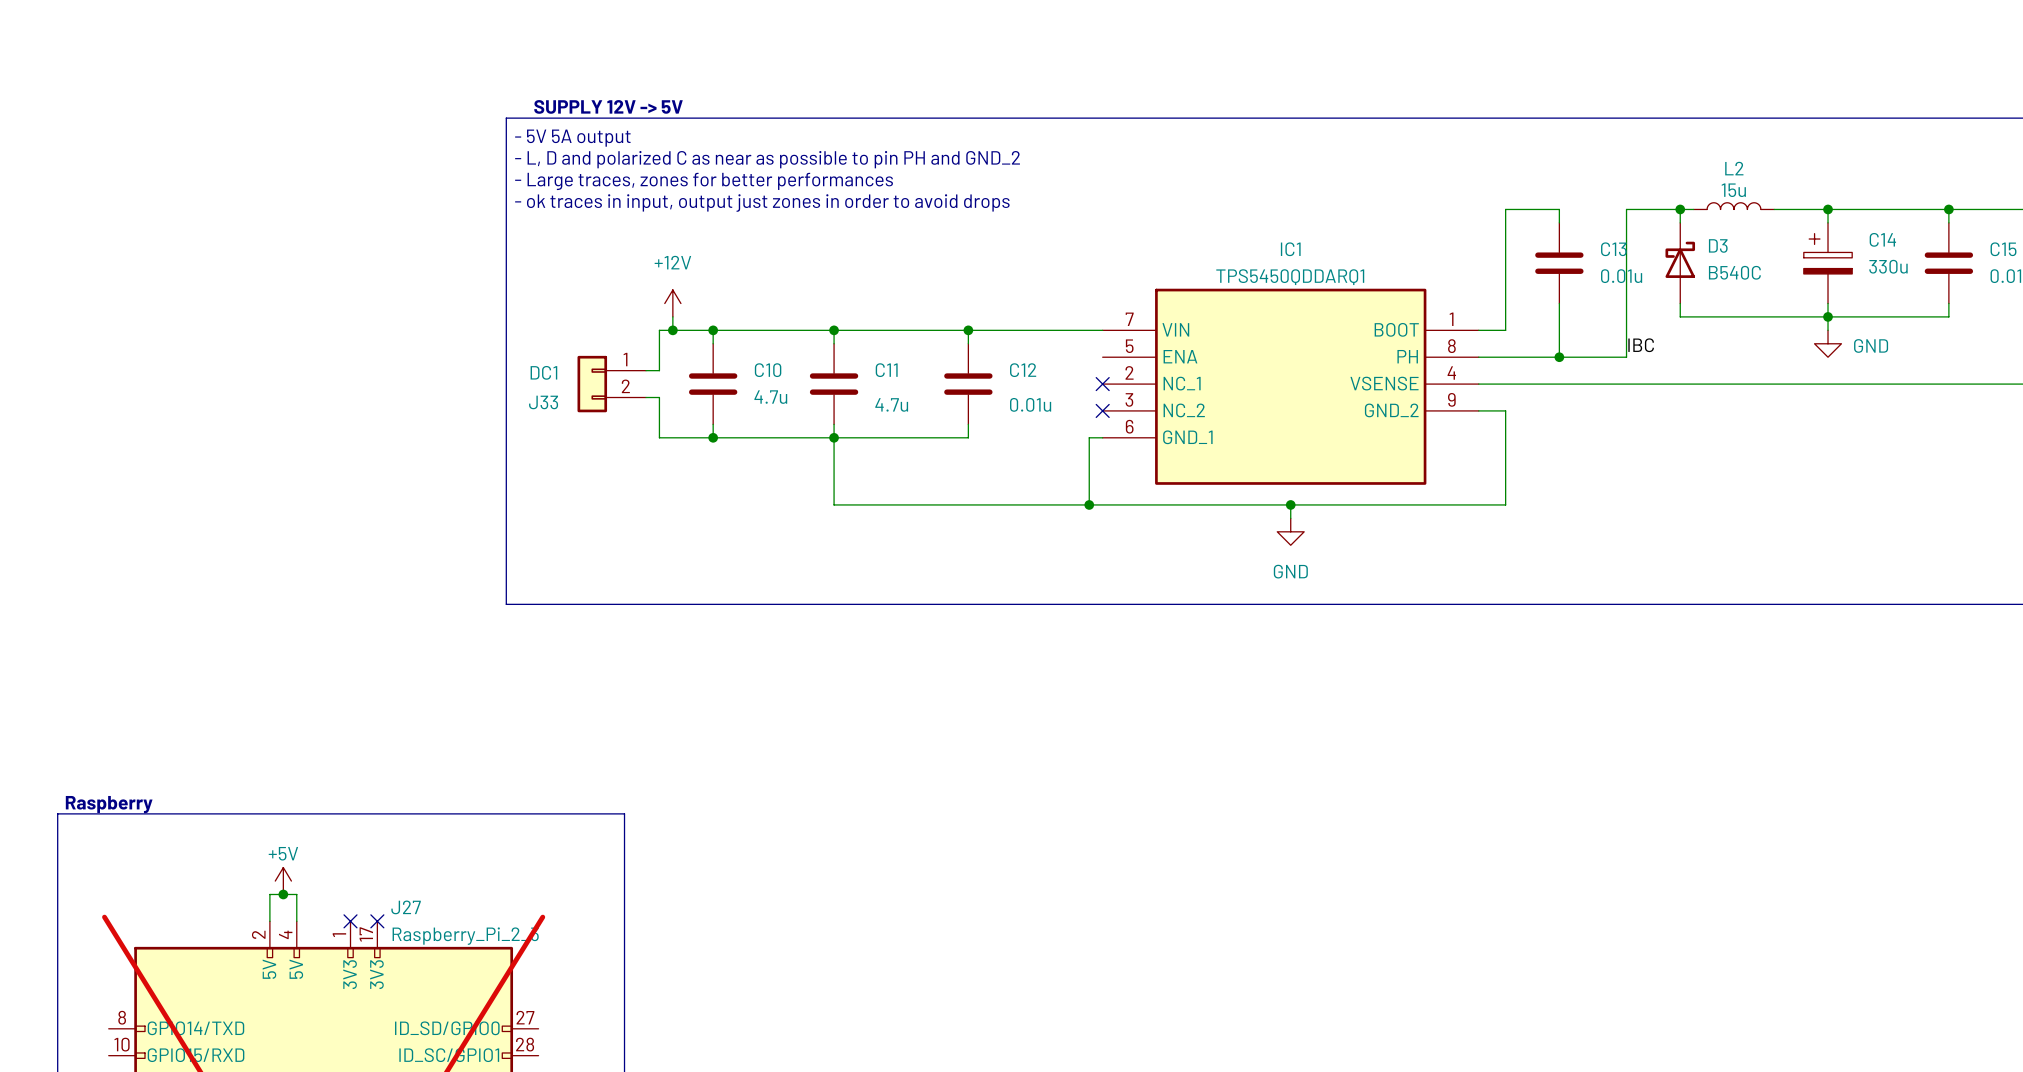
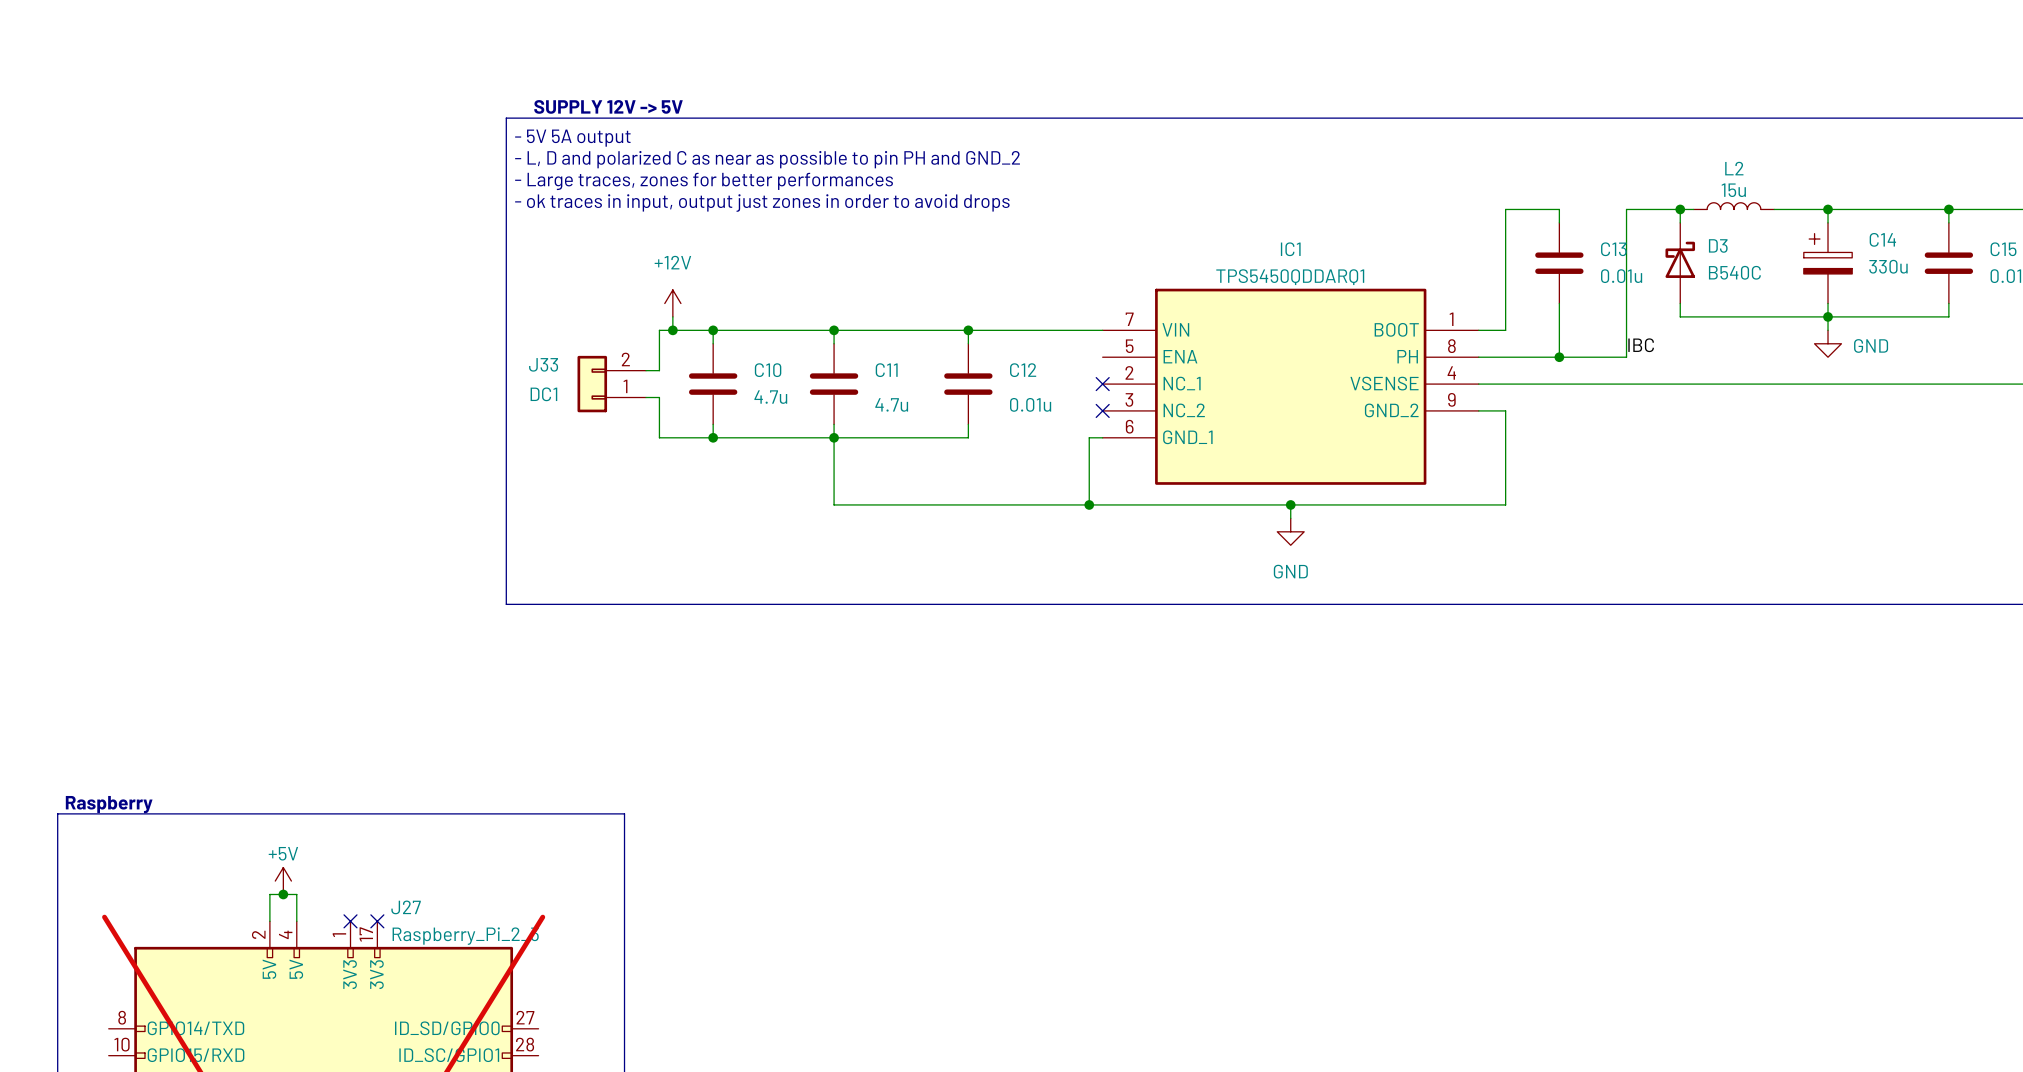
J33 flip: as is (592, 384) -> up-down (592, 384)

